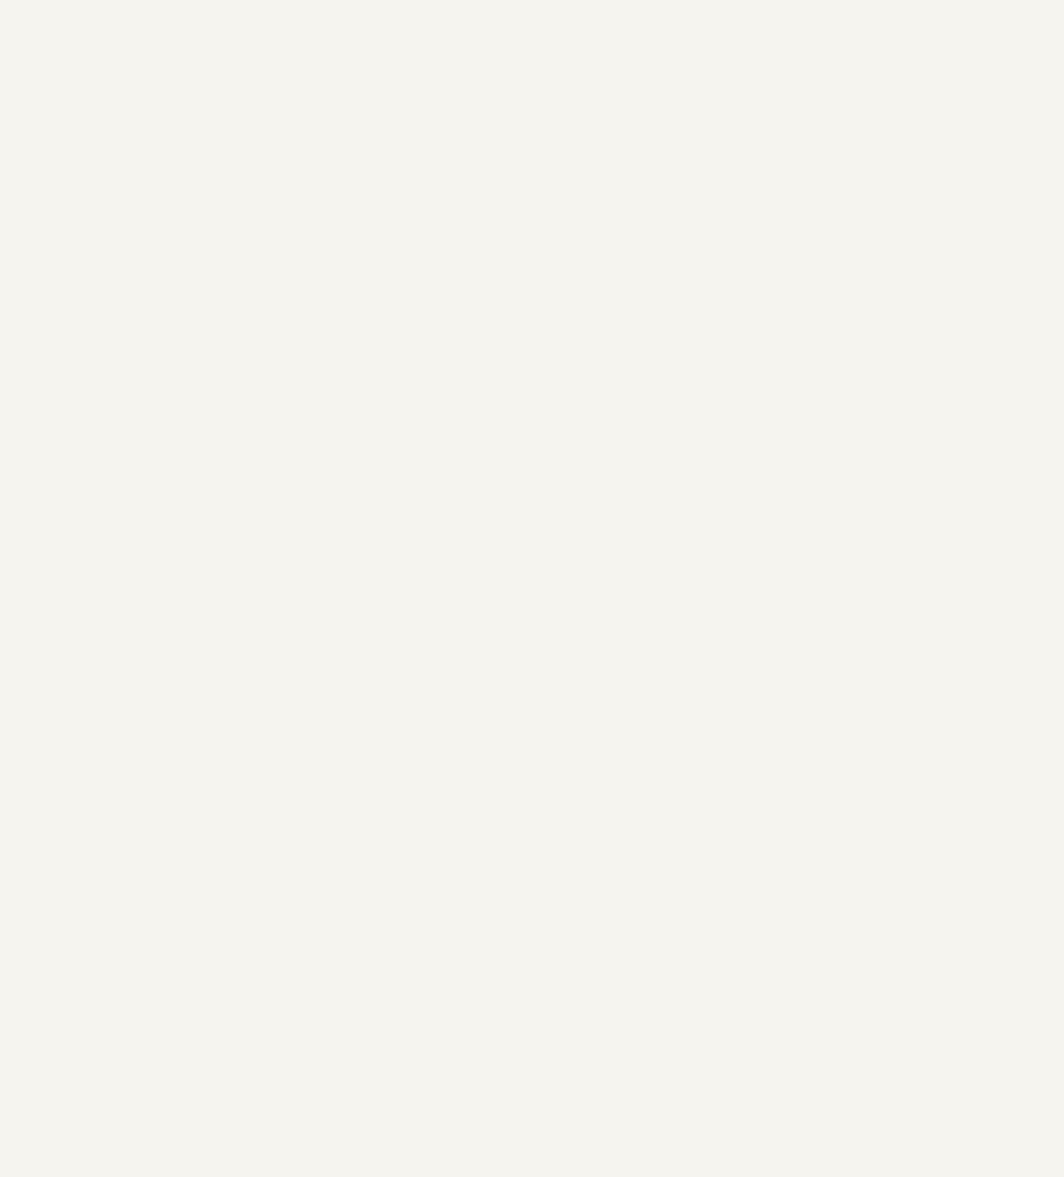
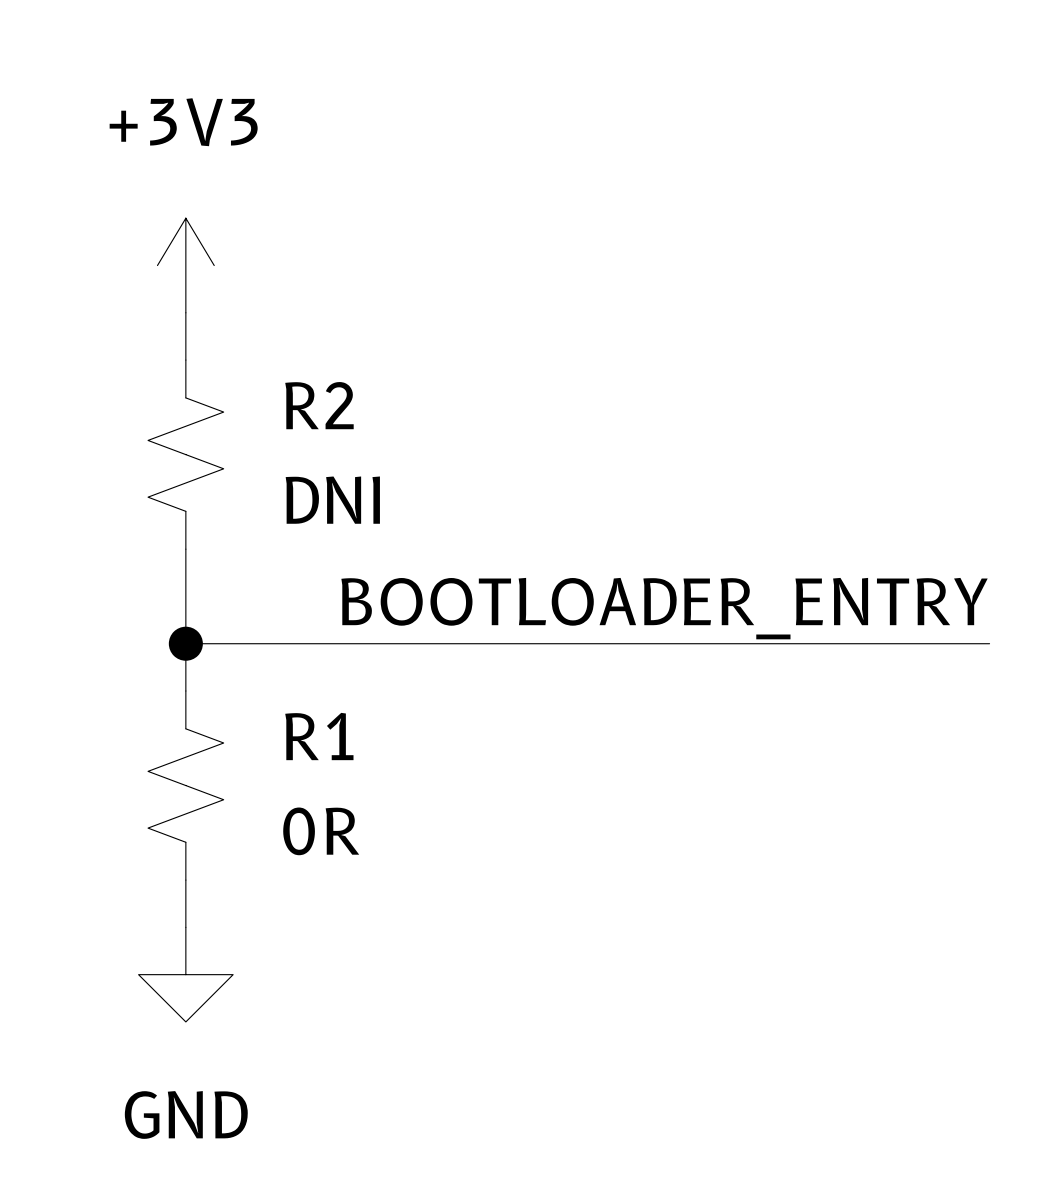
power symbol: none -> +3V3 (185, 265)
wire: none -> (185, 312) (185, 360)
R2: none -> DNI (185, 454)
wire: none -> (185, 549) (185, 691)
label: none -> BOOTLOADER_ENTRY (664, 608)
wire: none -> (185, 643) (989, 643)
junction: none -> (185, 643)
R1: none -> 0R (185, 785)
wire: none -> (185, 880) (185, 927)
power symbol: none -> GND (185, 974)

